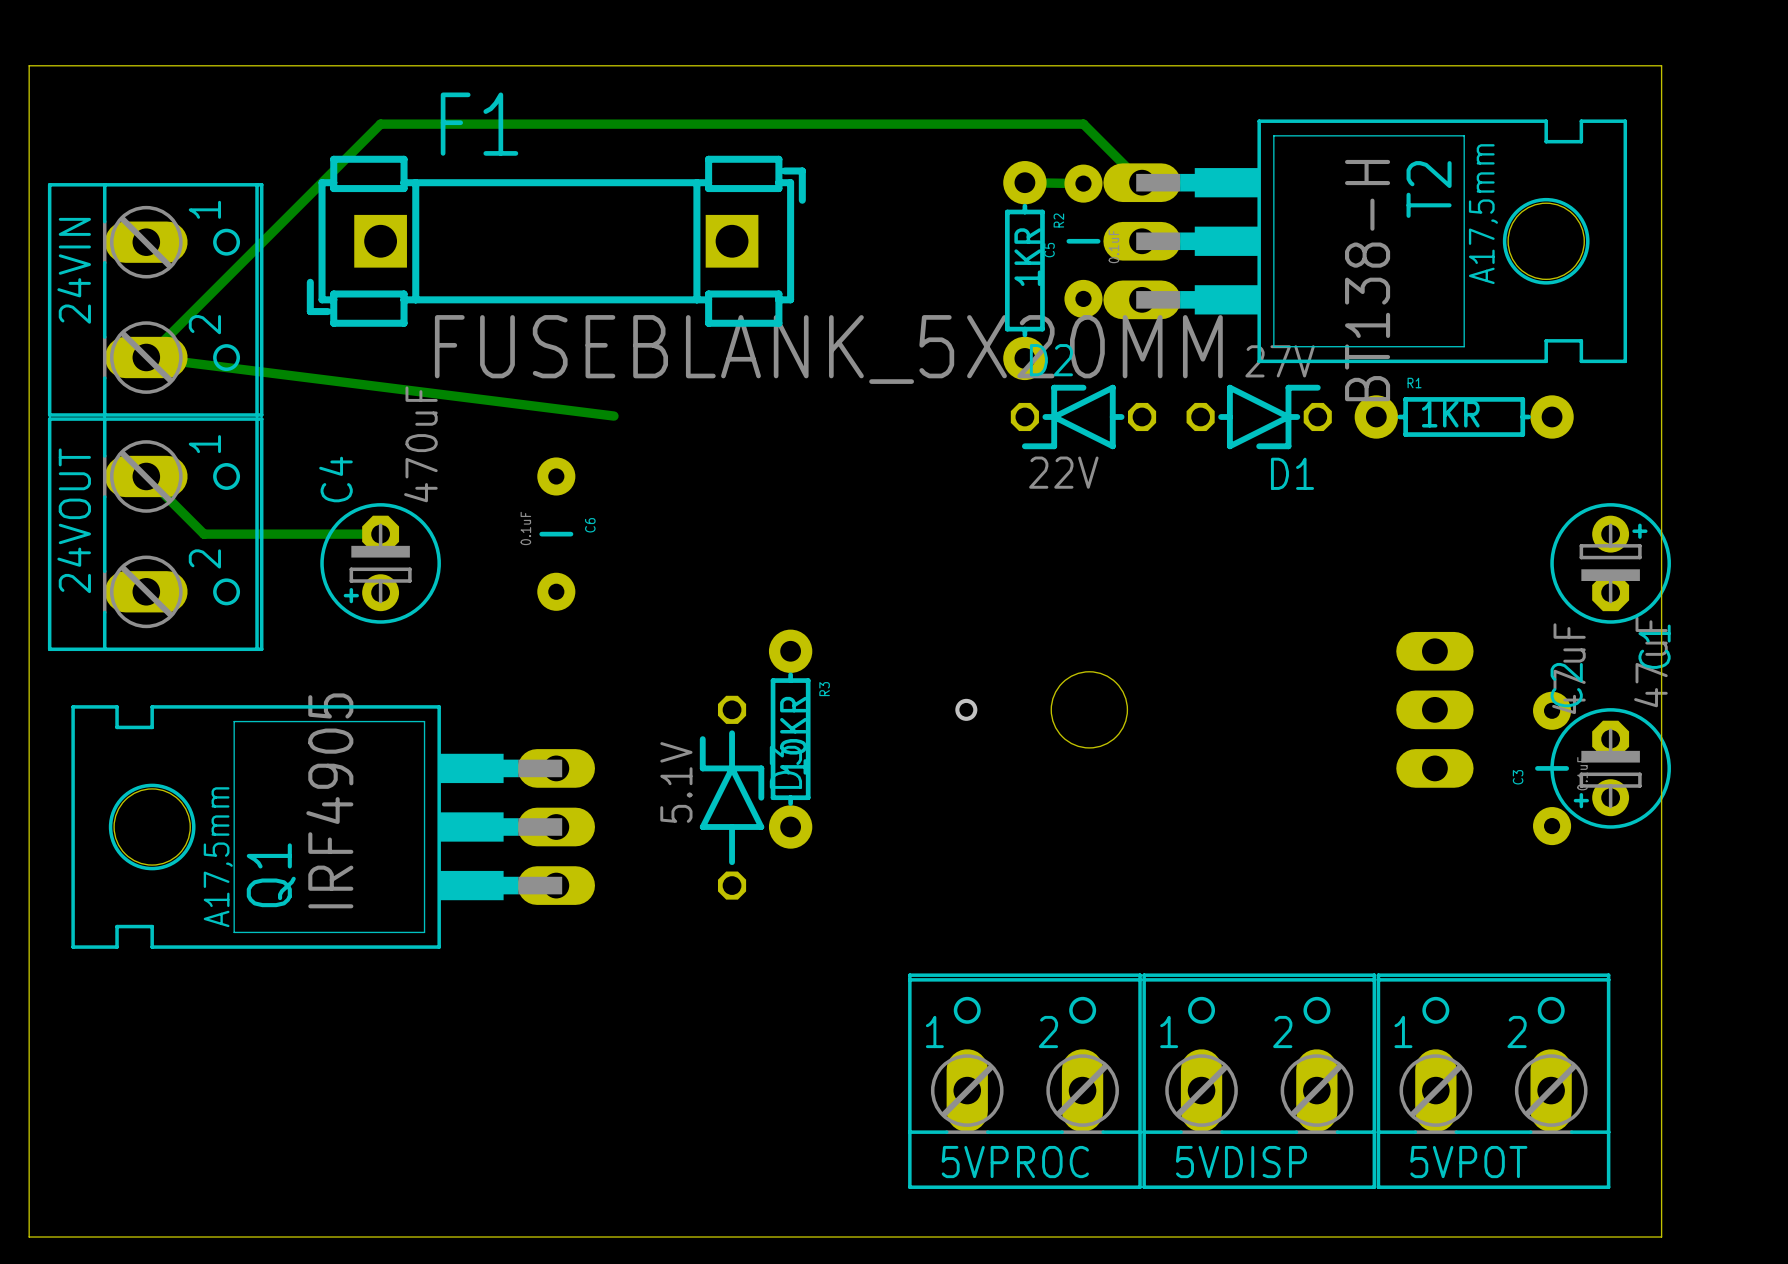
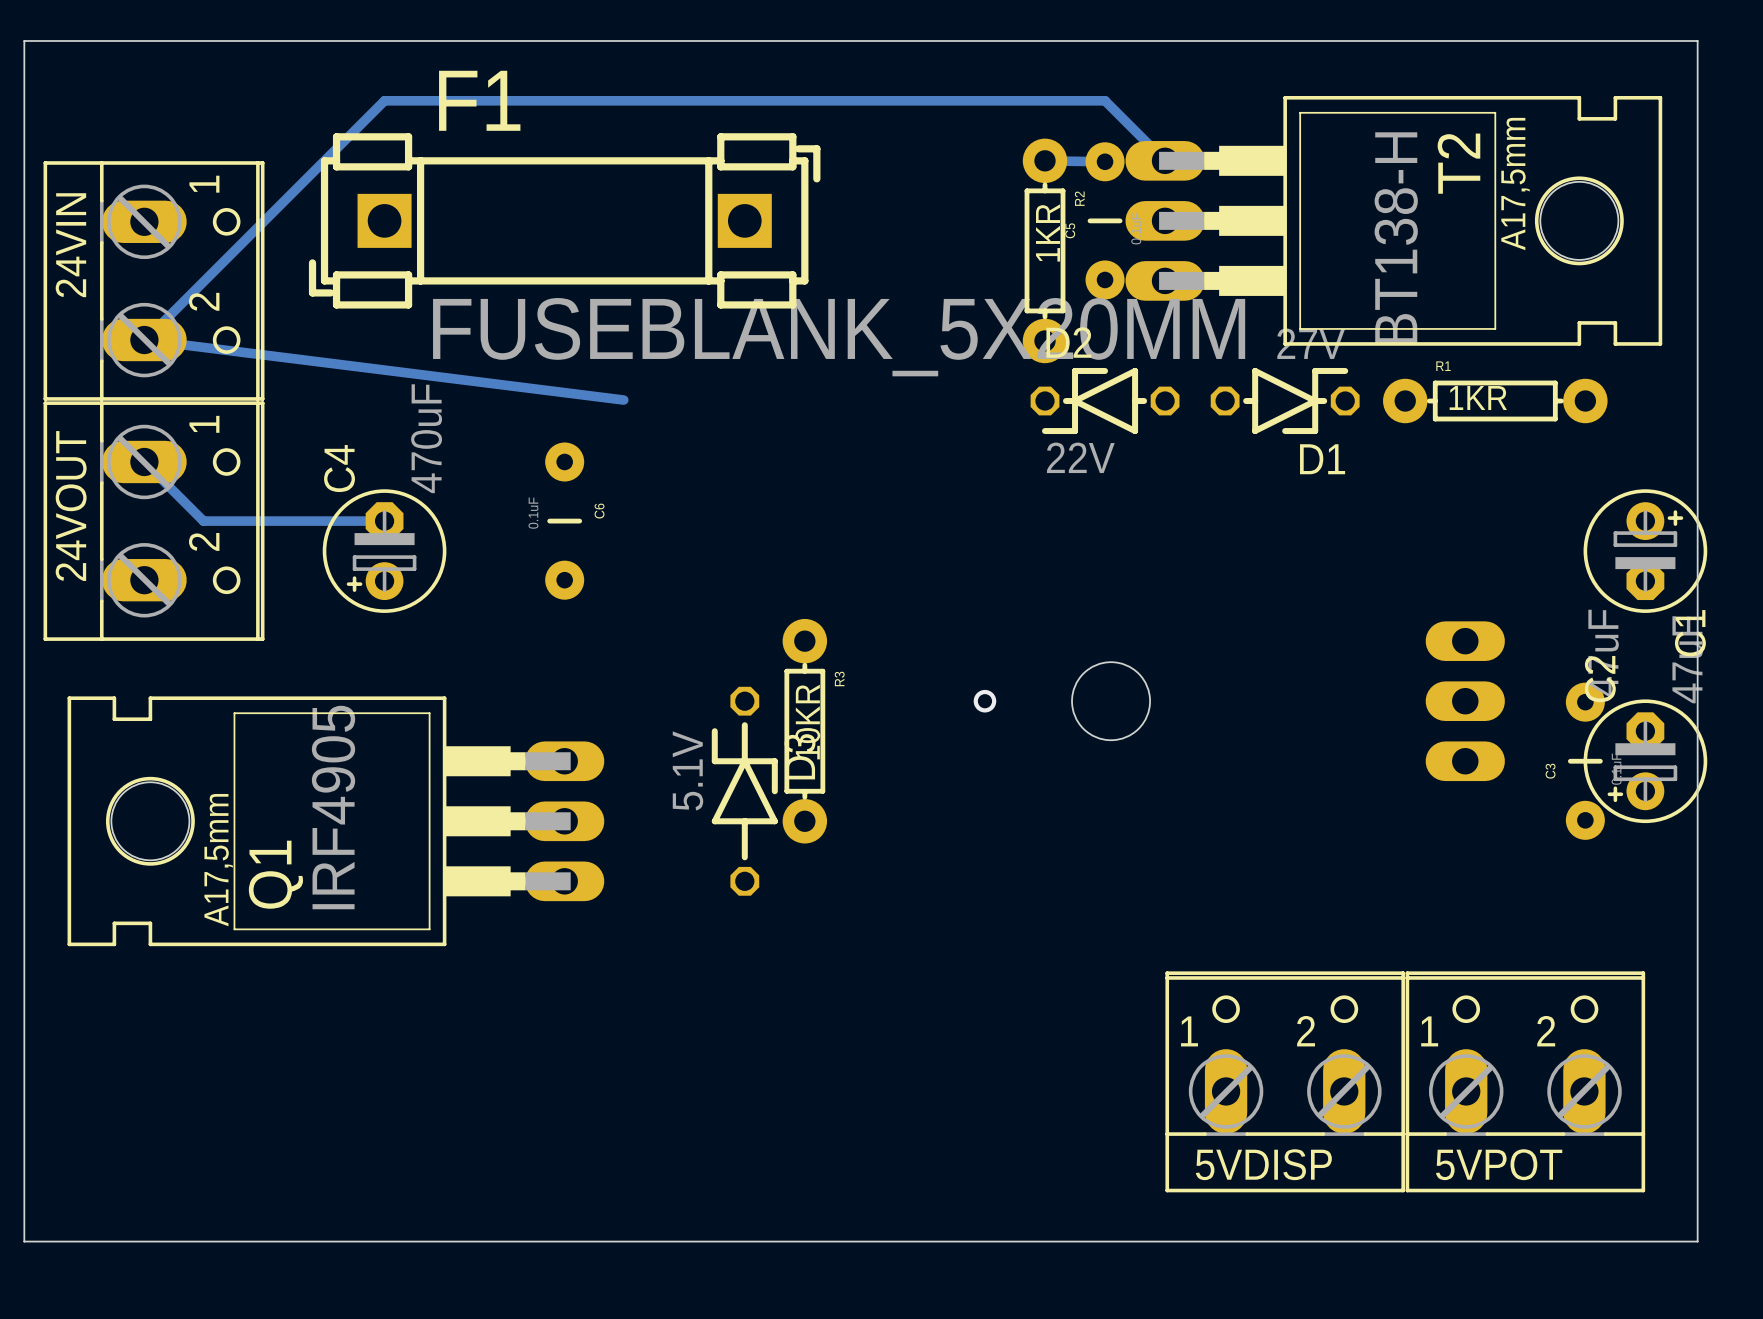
5VPROC: (1024, 1081) -> none

